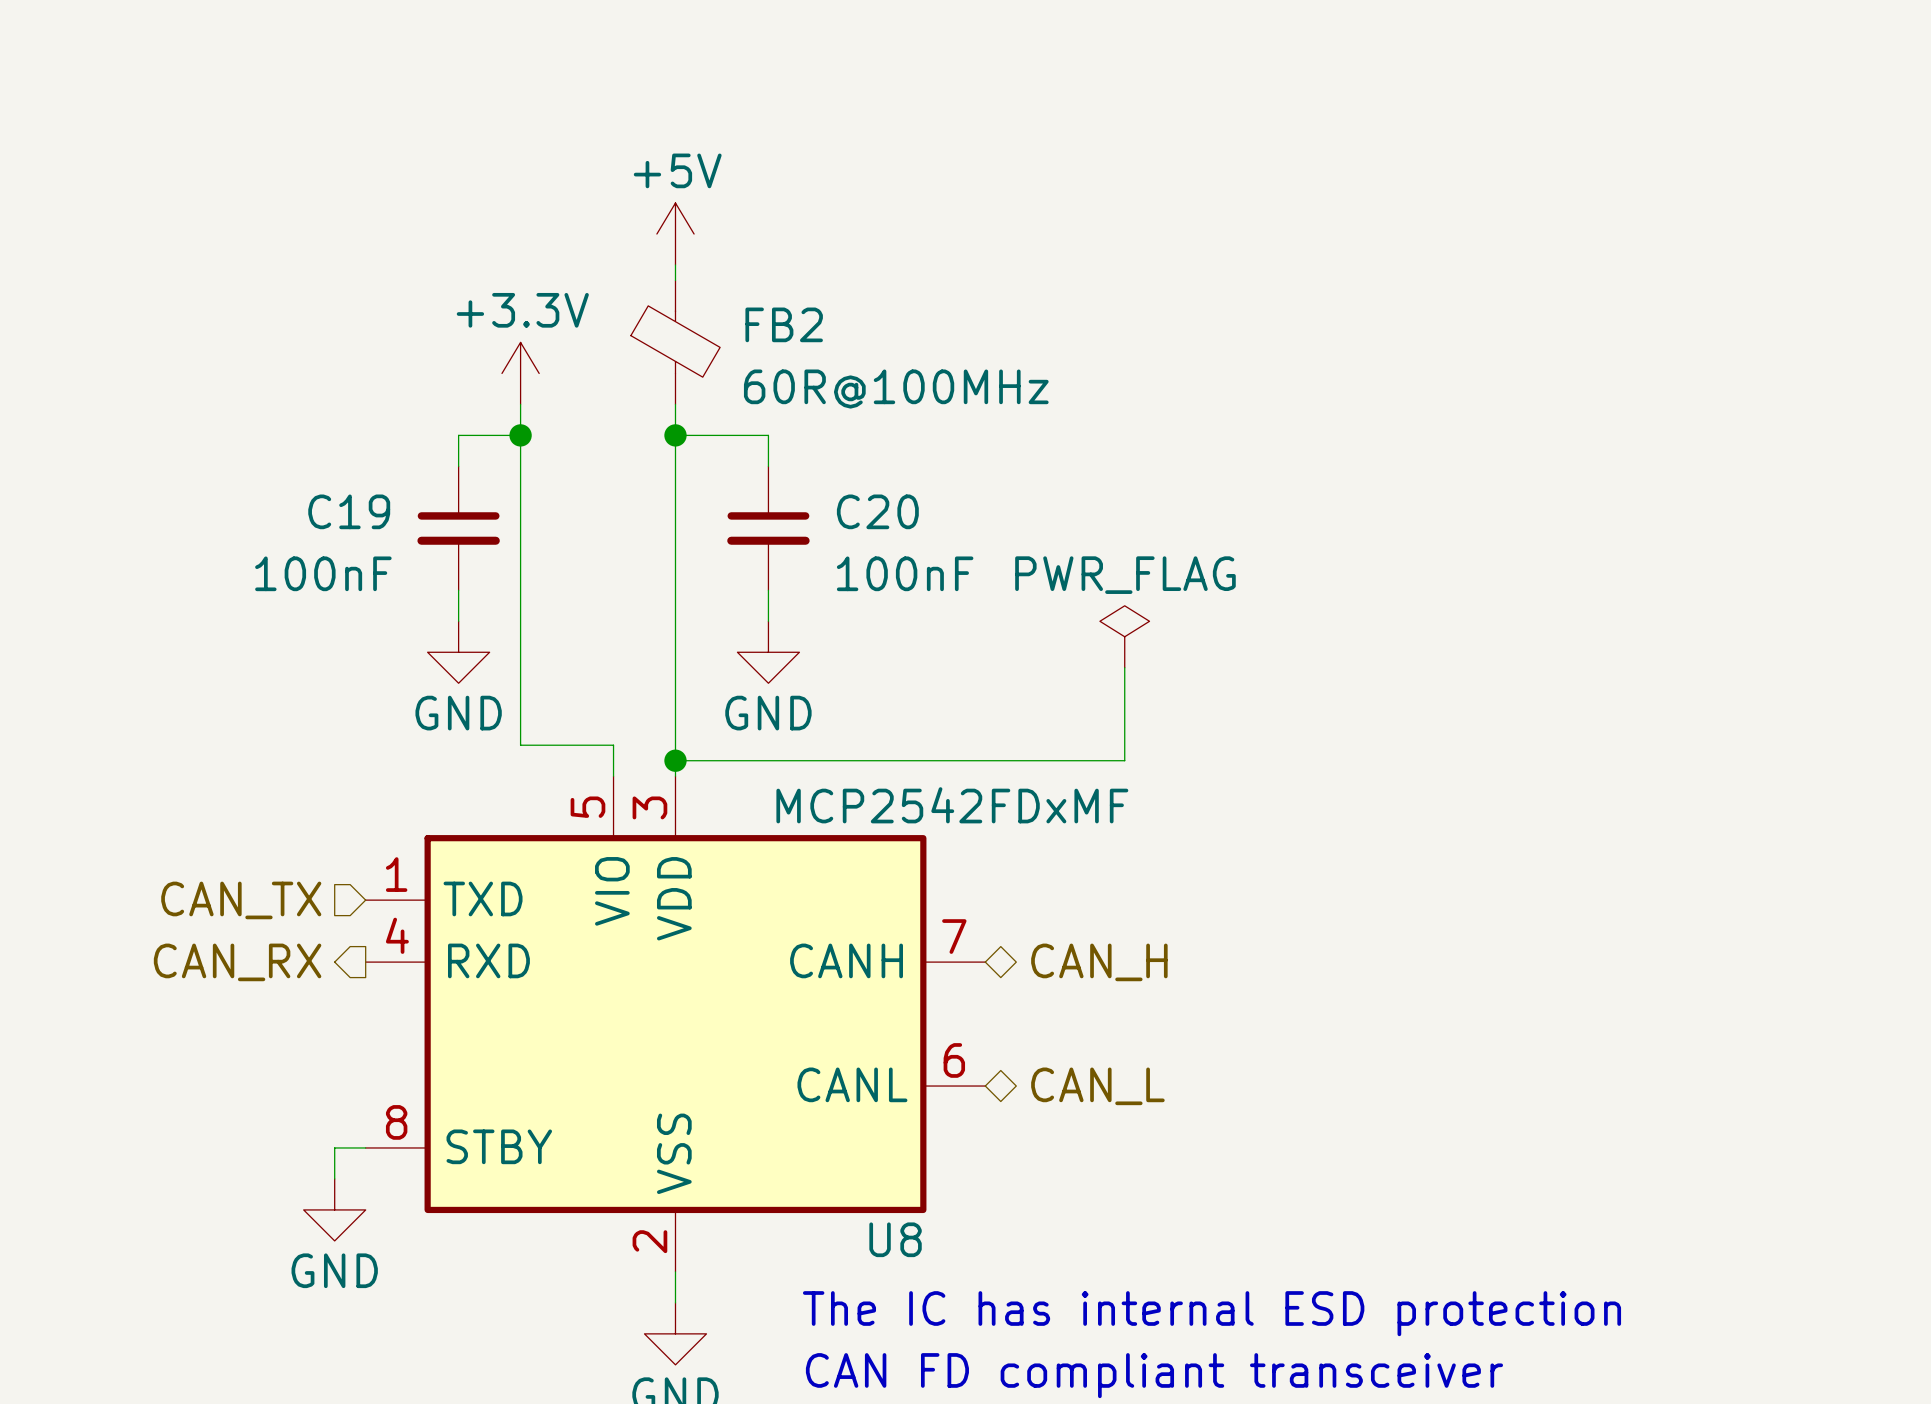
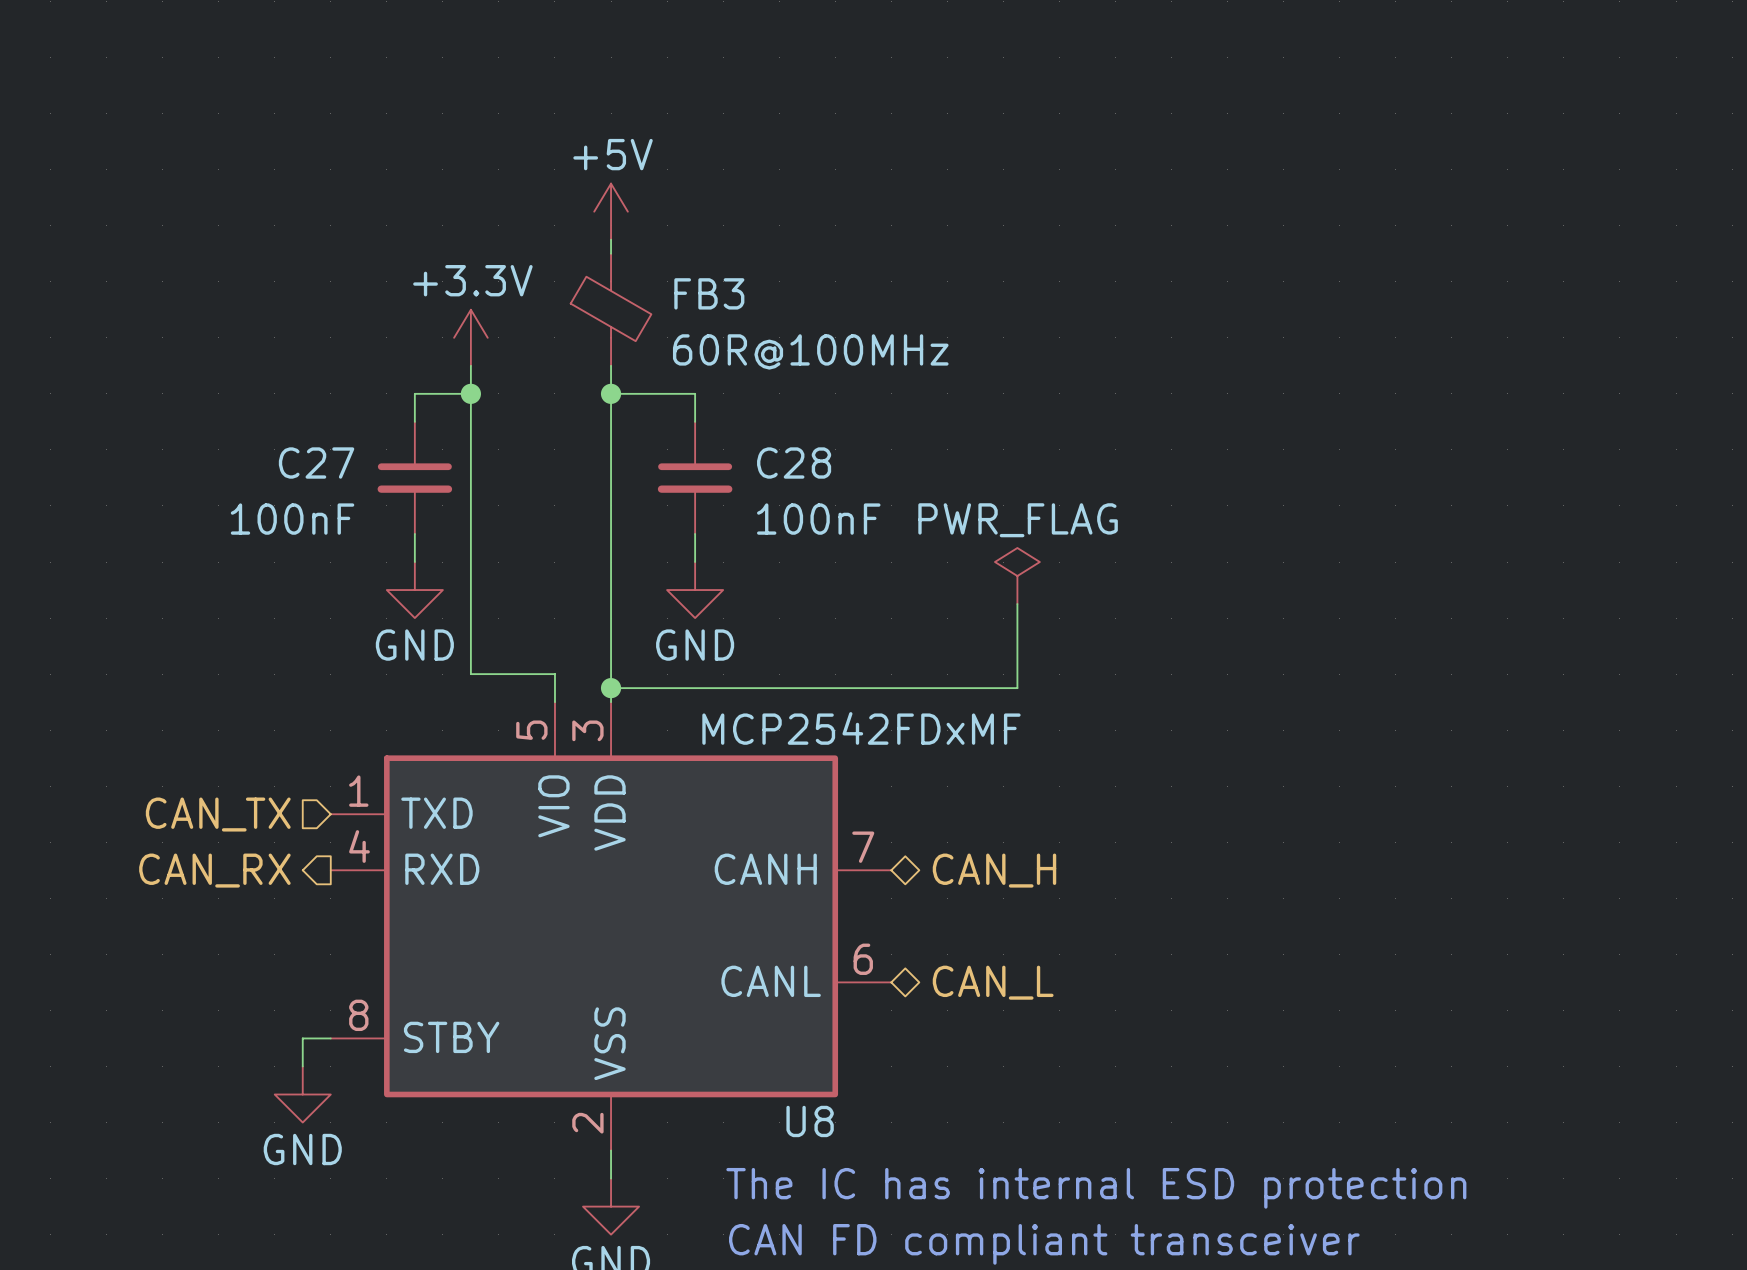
FB2 name: FB2 (784, 324) -> FB3 (709, 293)
C19 name: C19 (349, 511) -> C27 (316, 463)
C20 name: C20 (877, 511) -> C28 (794, 463)

